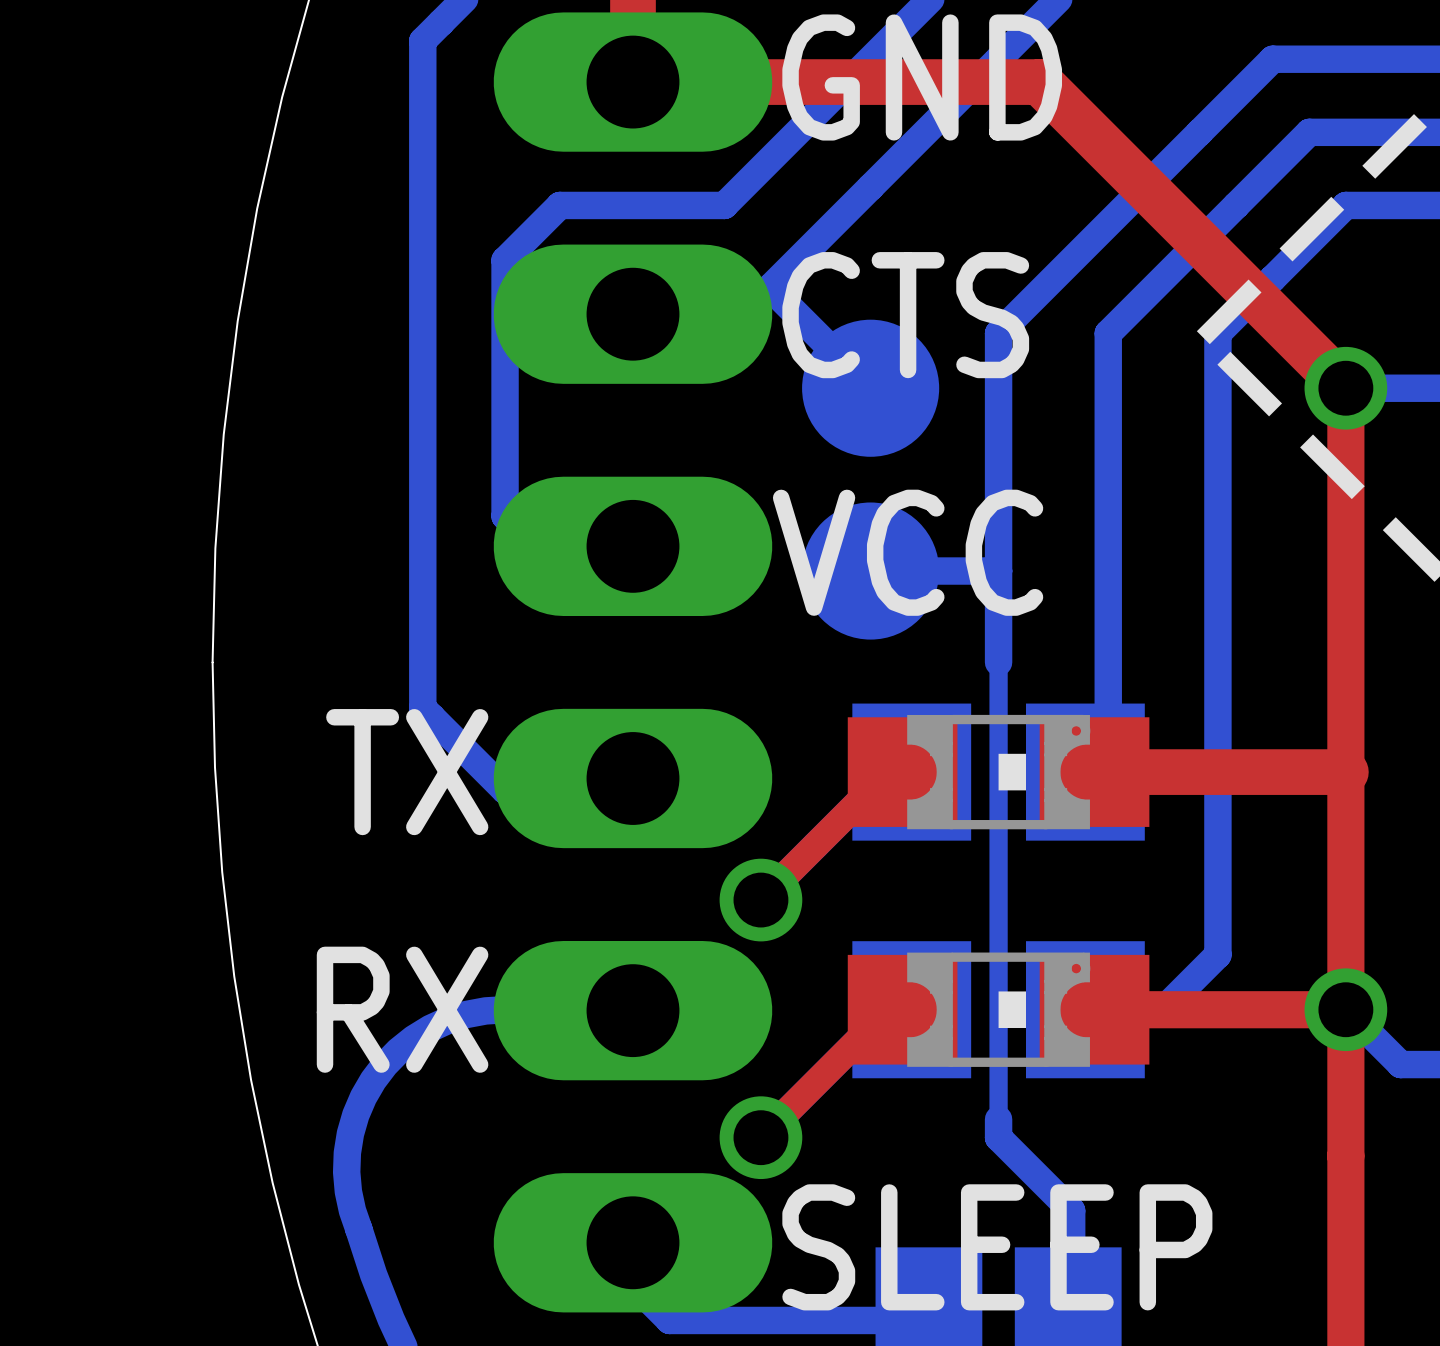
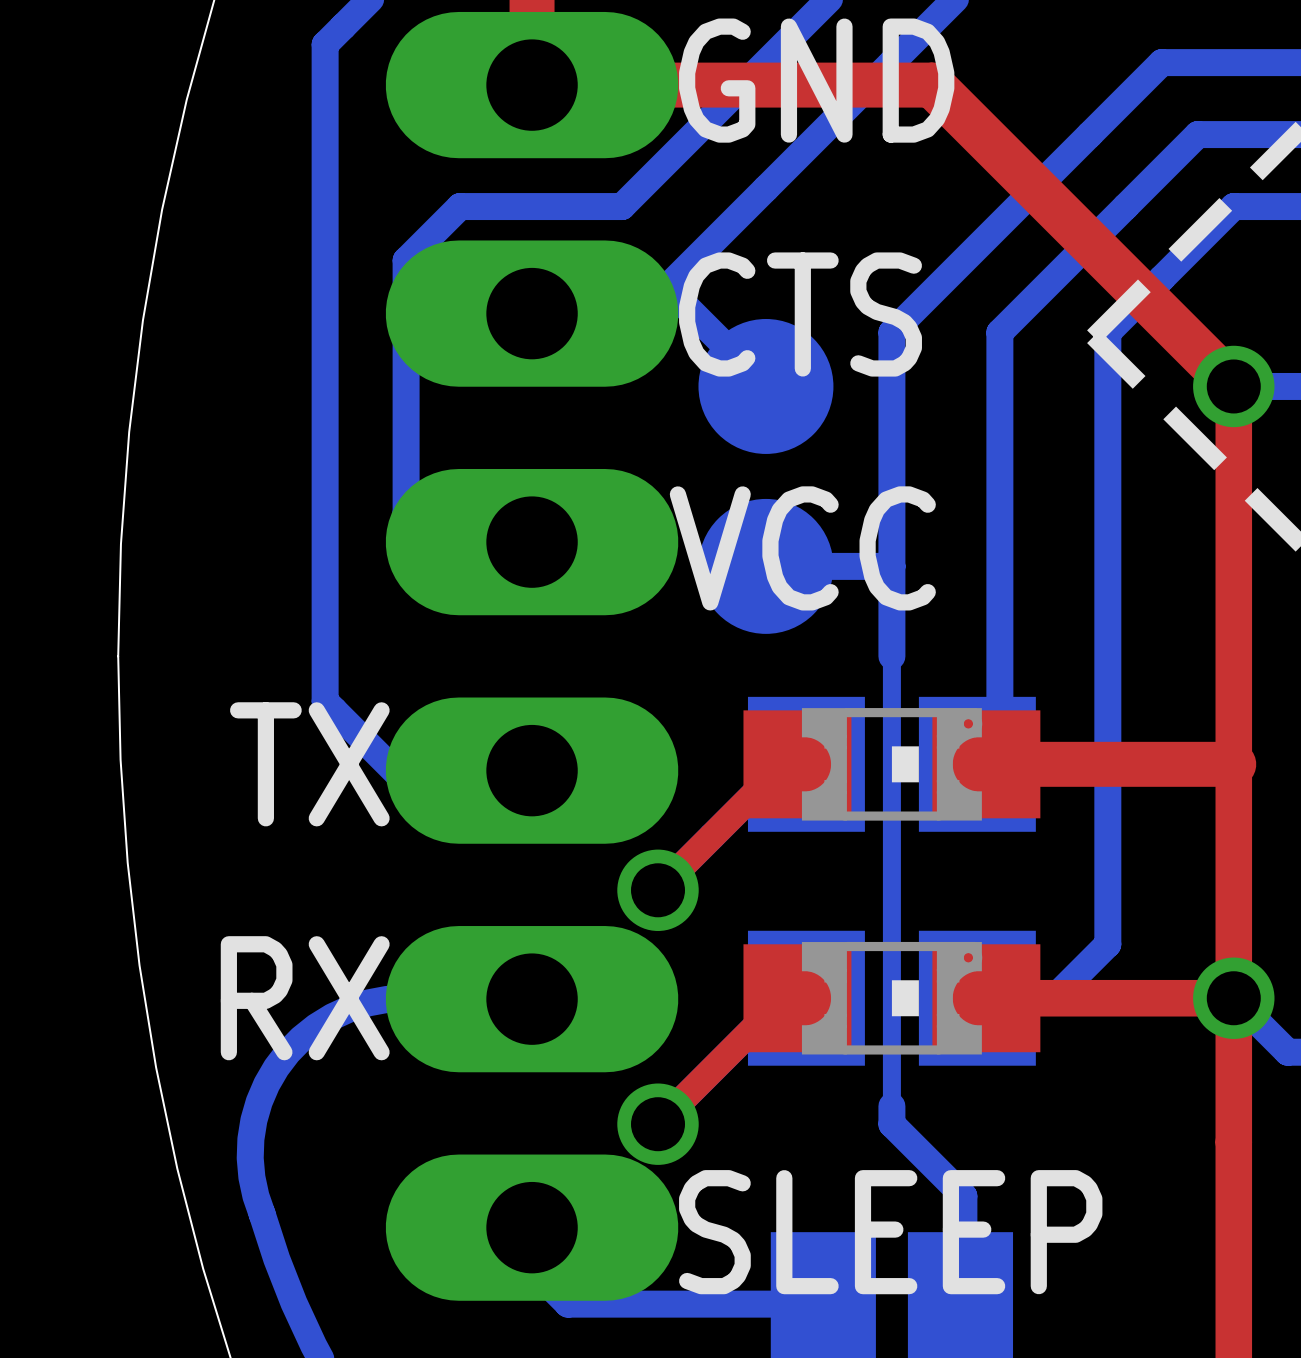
part footprint: [493, 12, 773, 1313] -> [385, 11, 679, 1301]

